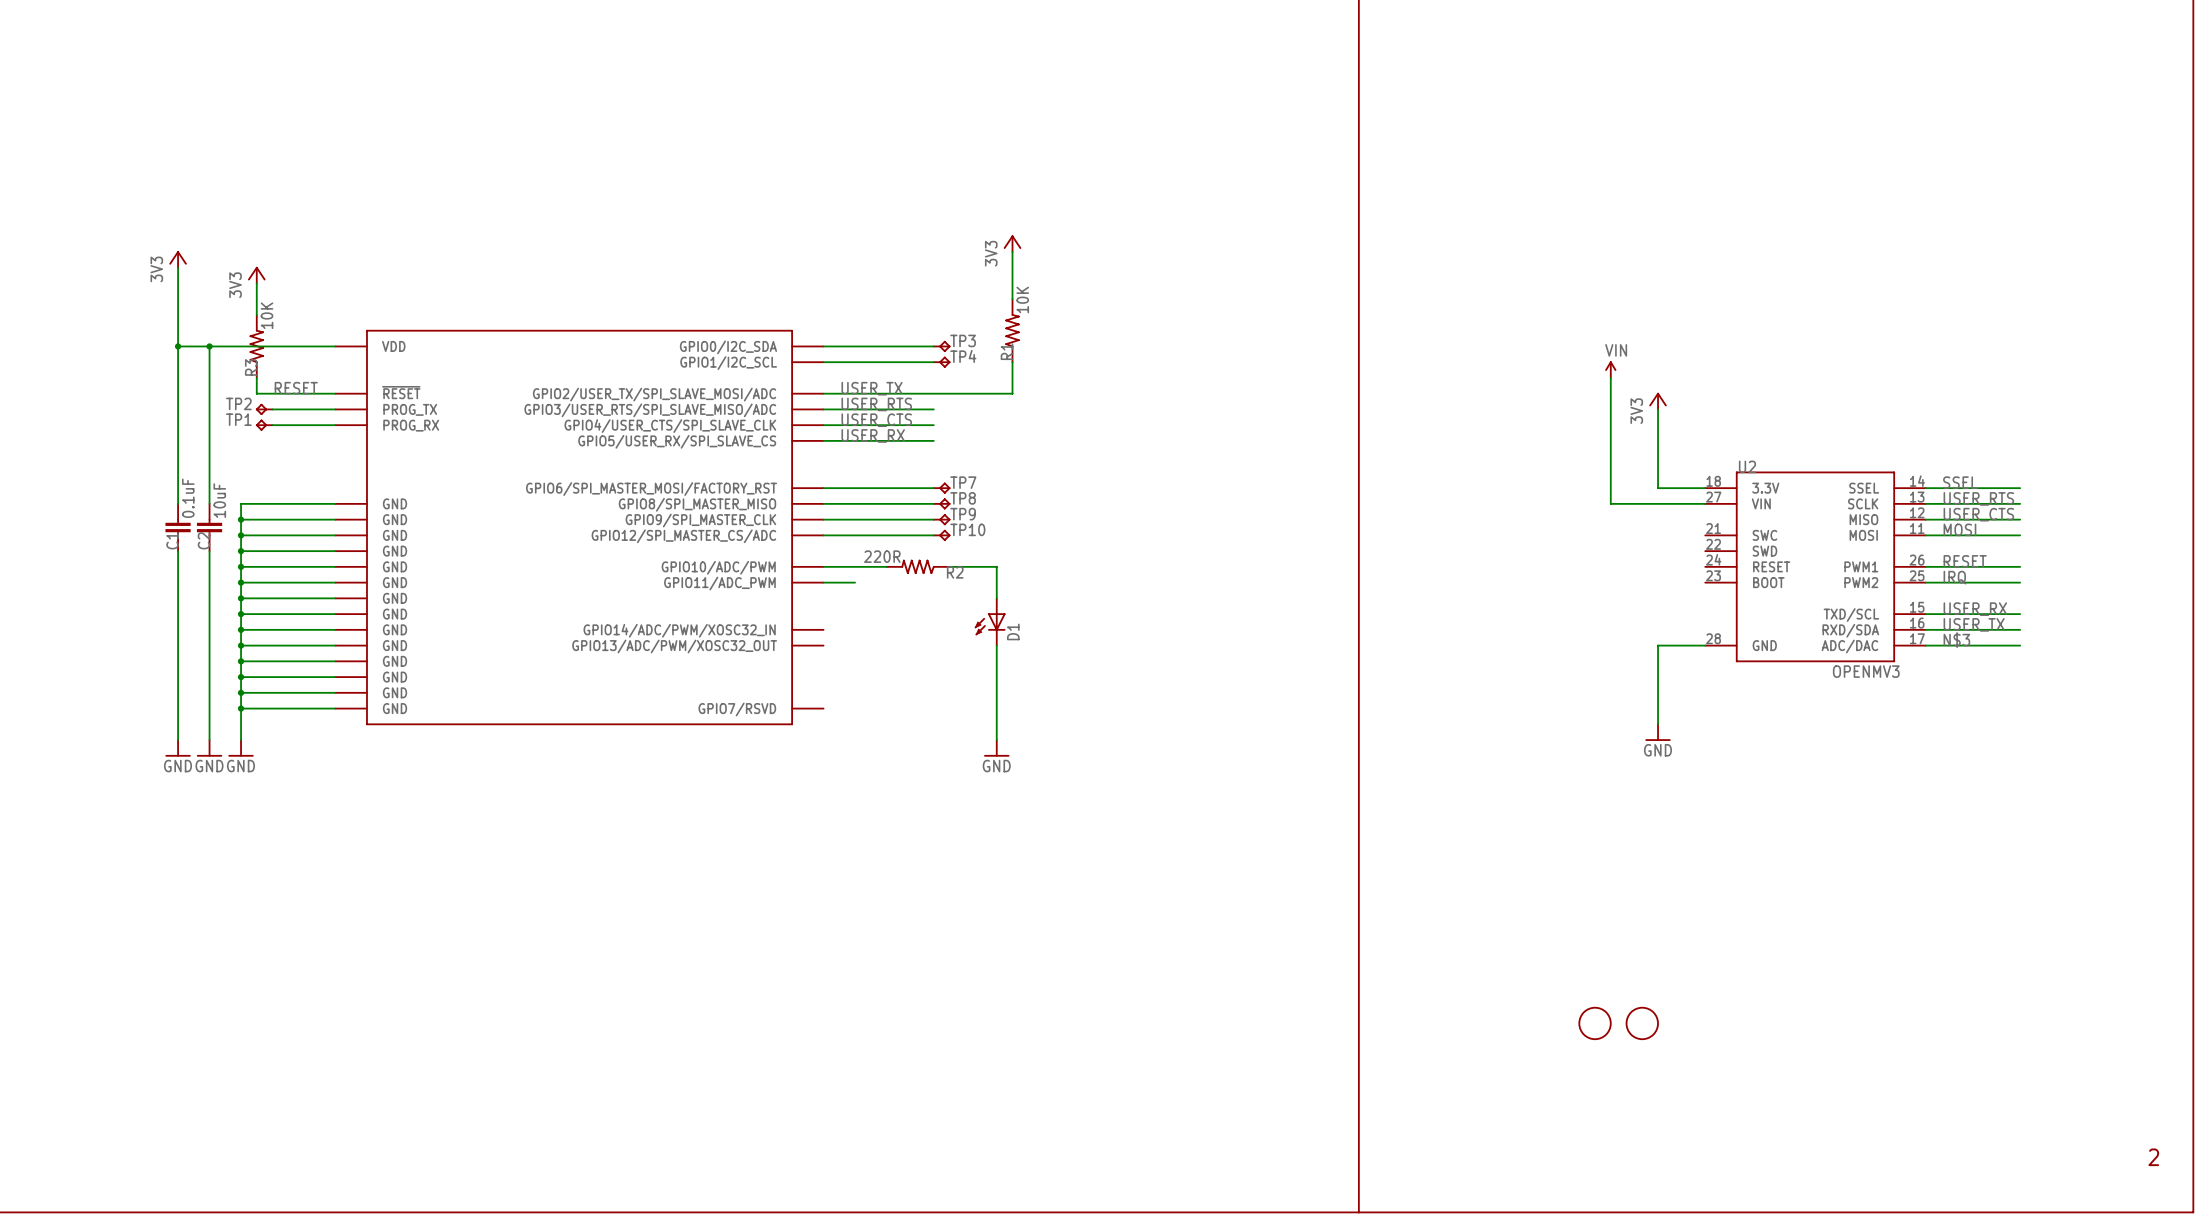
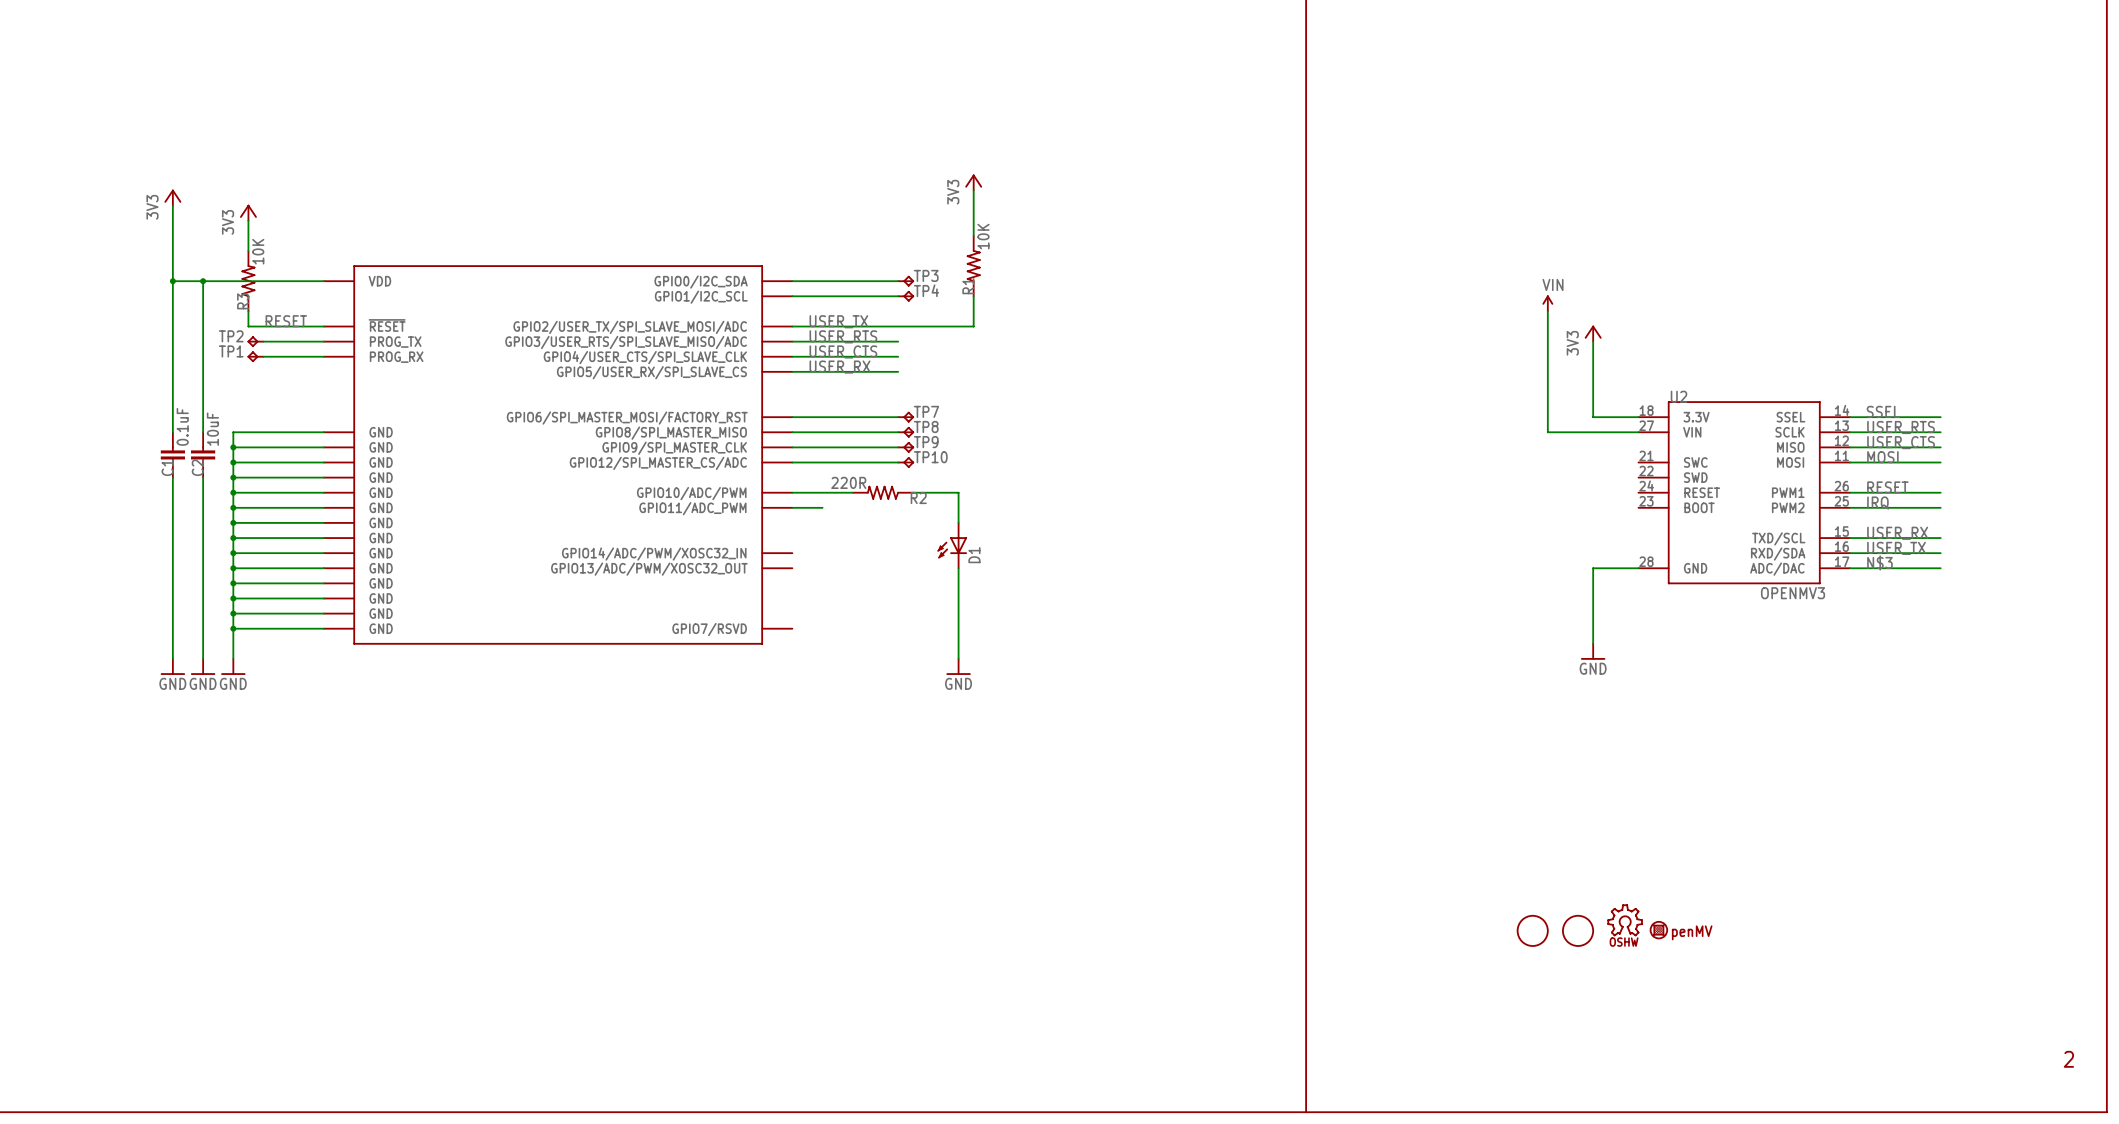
part: none -> (1625, 920)
part: none -> (1658, 930)

